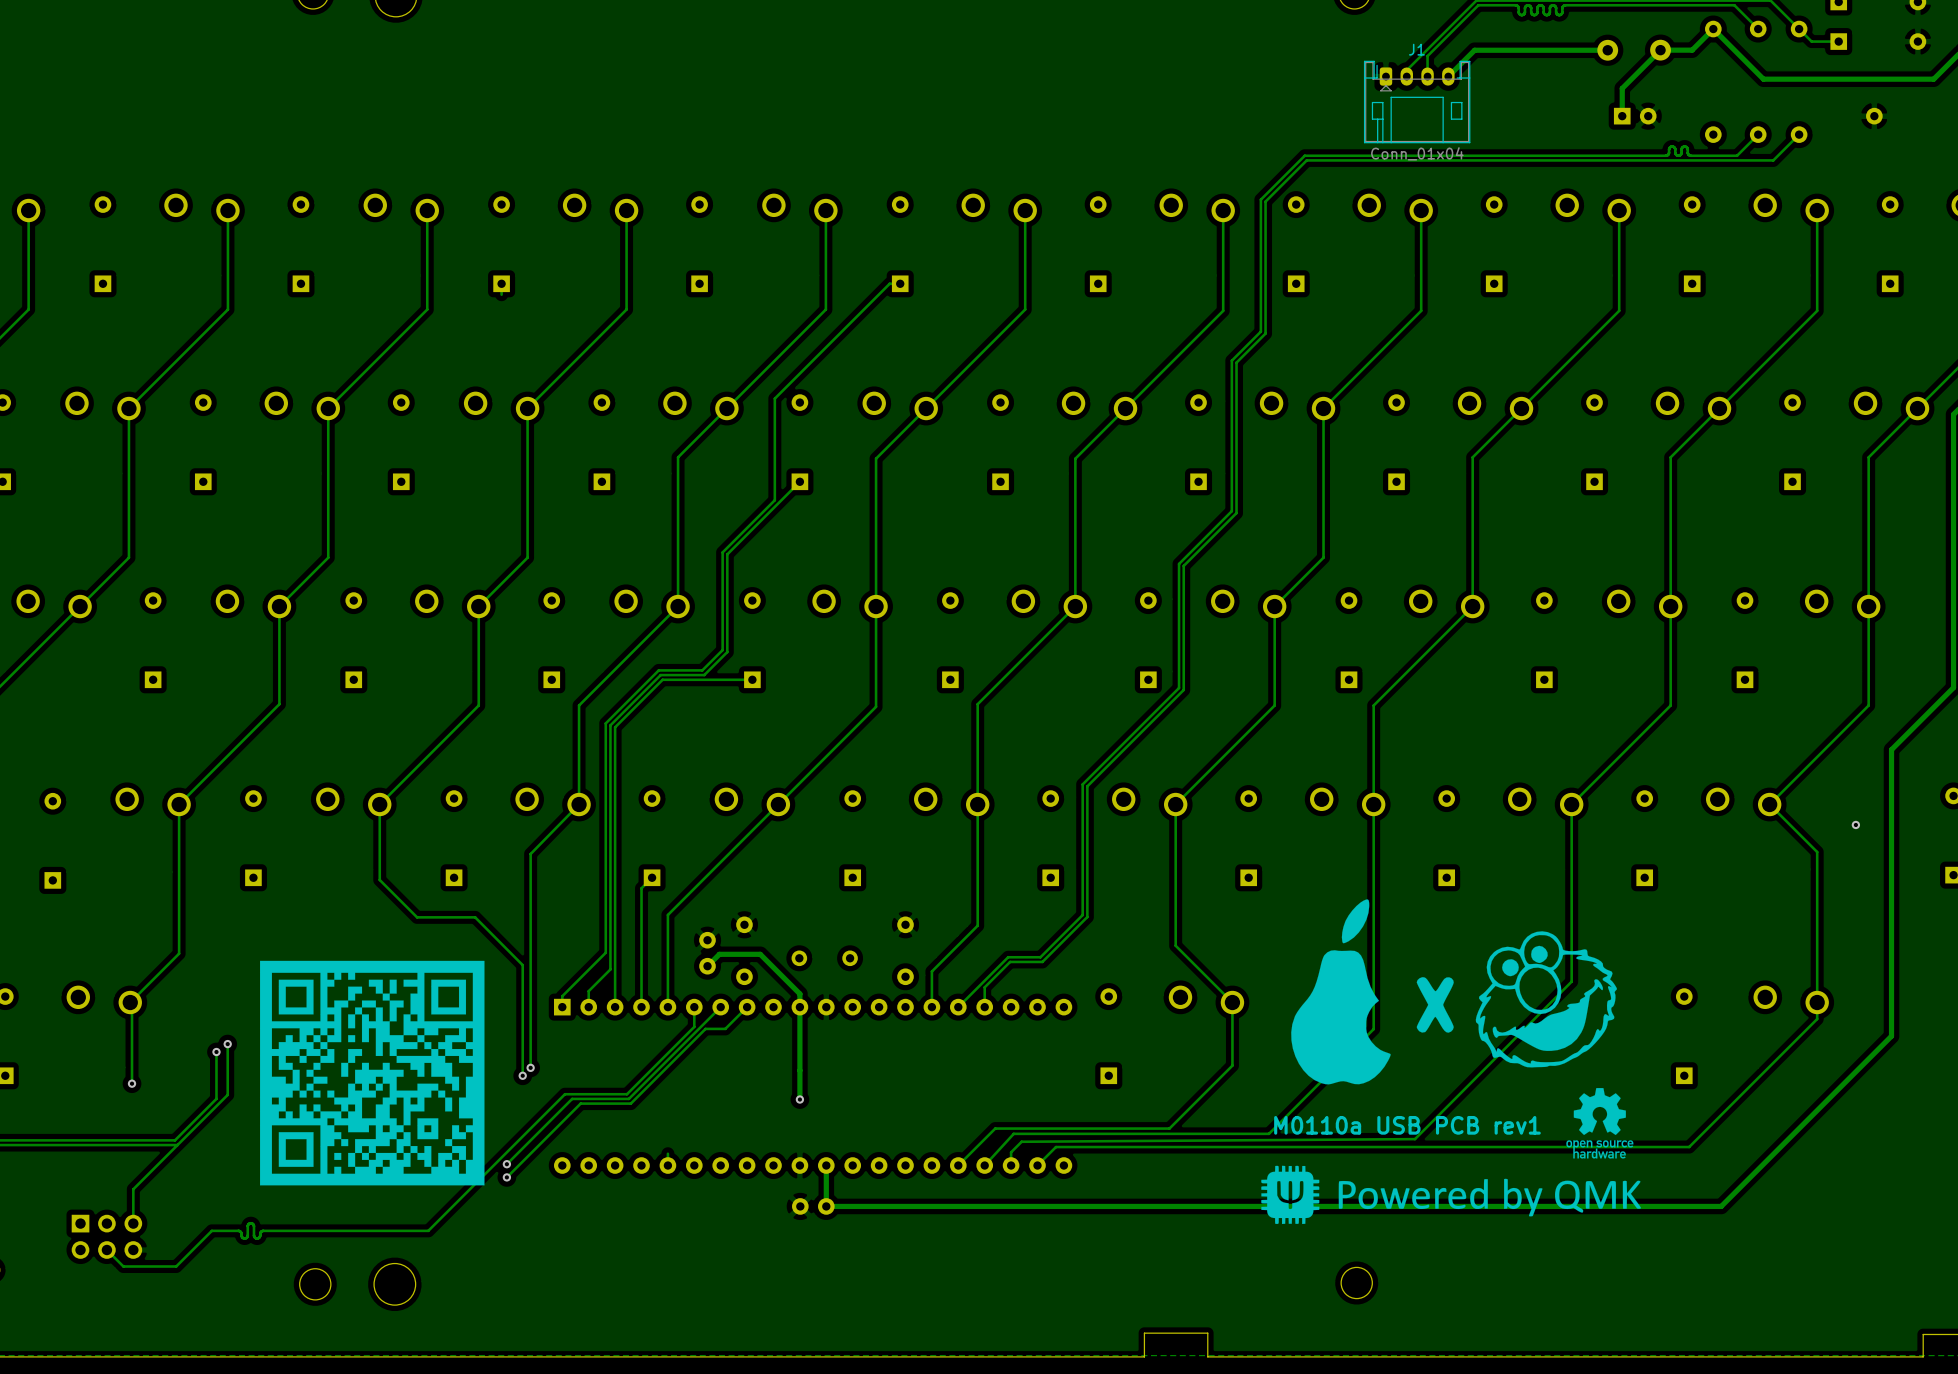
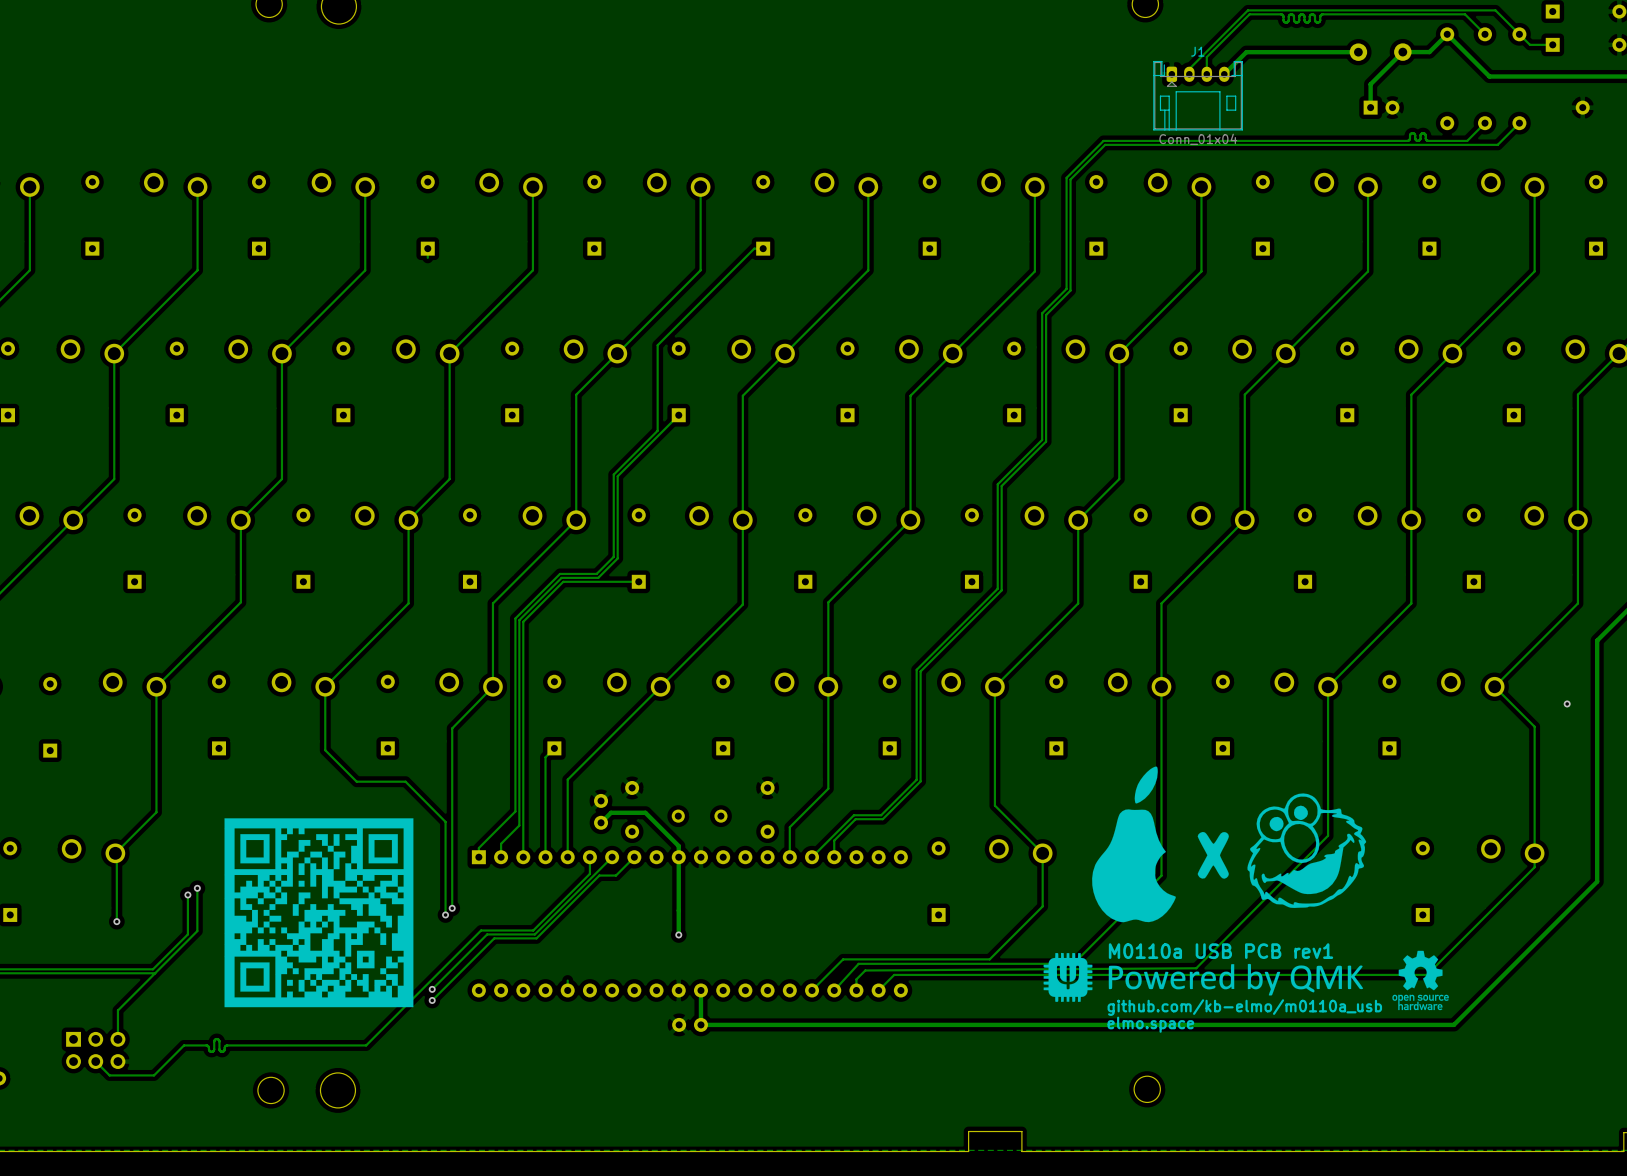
drawing position: (1599, 1123) -> (1420, 980)
text position: M0110a USB PCB rev1 (1407, 1125) -> M0110a USB PCB rev1 (1221, 951)
text: none -> github.com/kb-elmo/m0110a_usb (1244, 1007)
drawing position: (1451, 1194) -> (1203, 977)
text: none -> elmo.space (1150, 1024)

